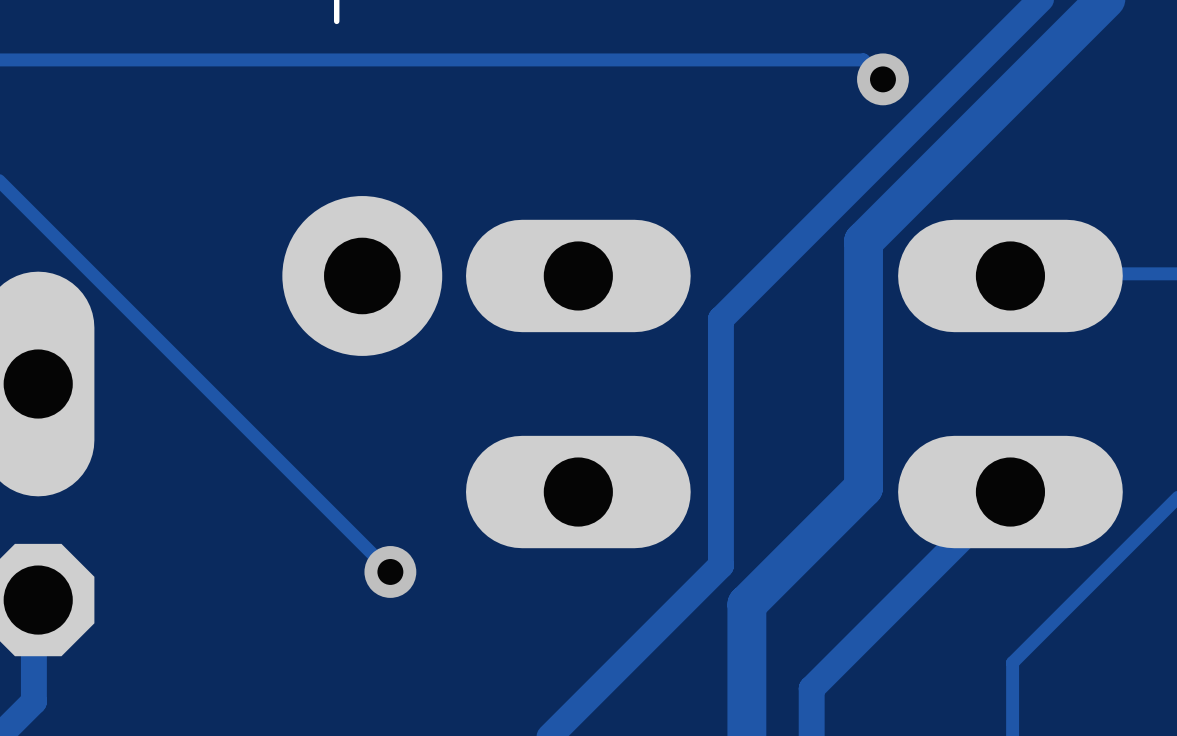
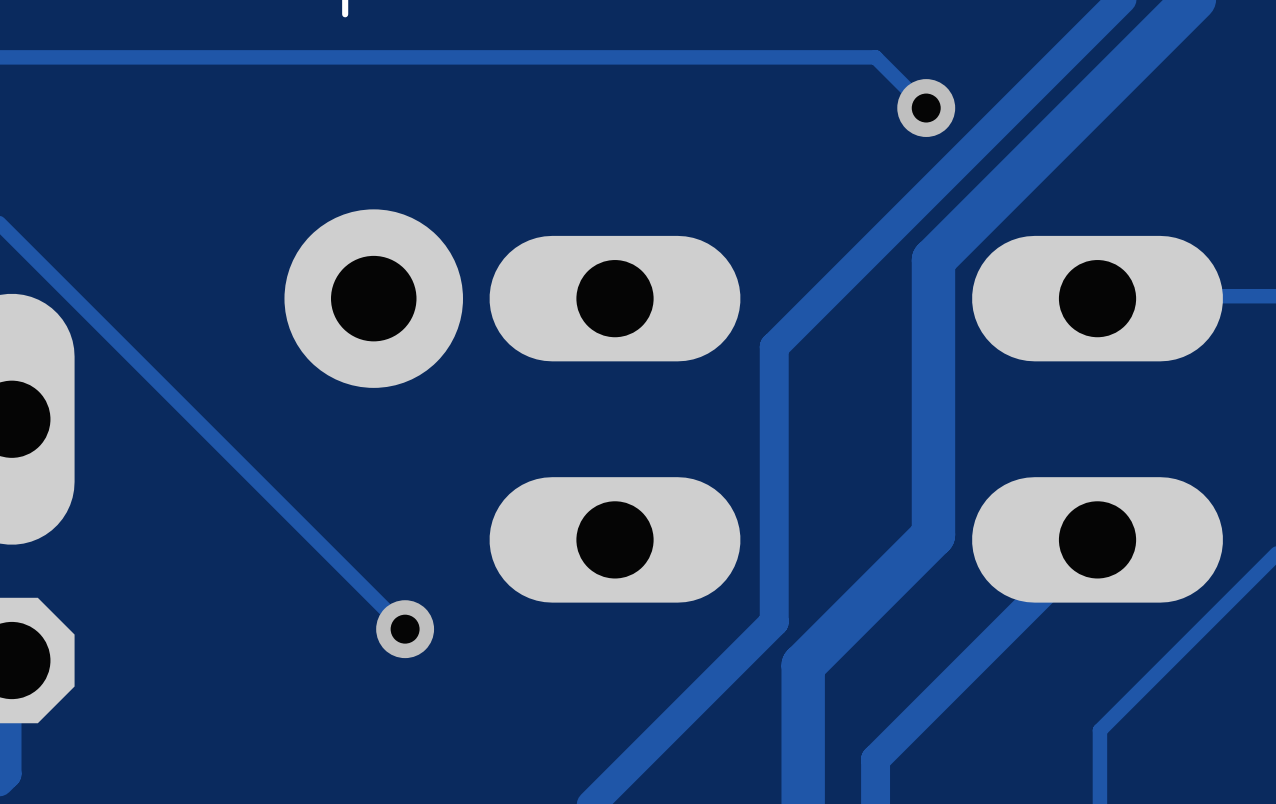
track: (811, 59) (863, 59) (882, 79) -> (875, 57) (926, 108)
via position: (882, 79) -> (926, 108)

